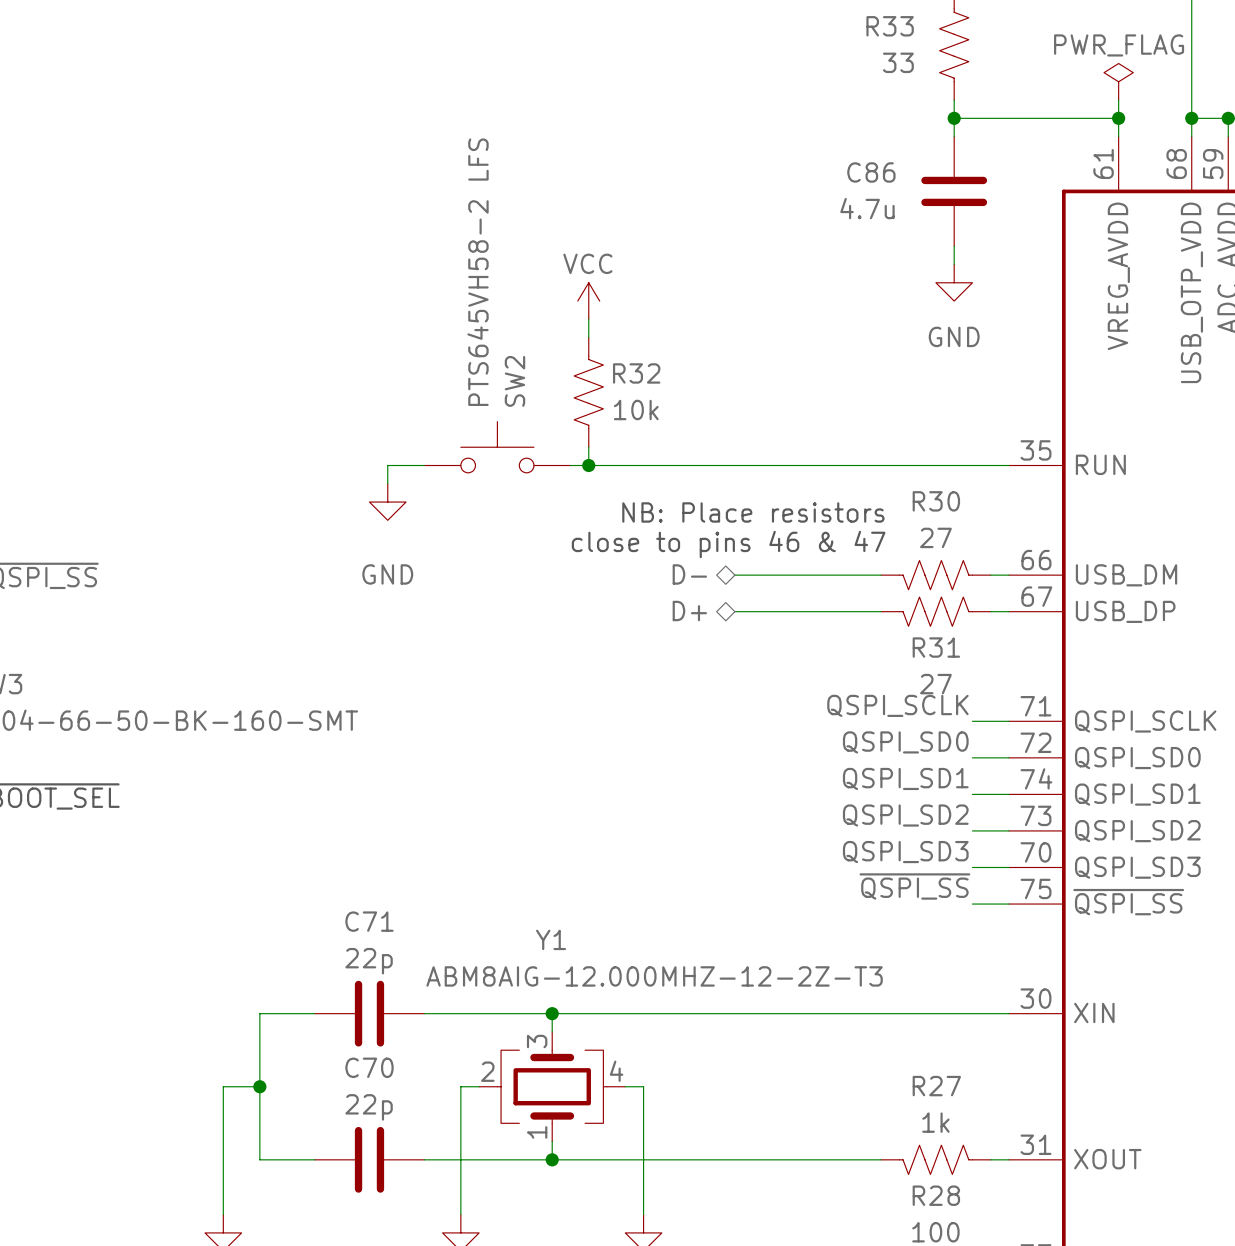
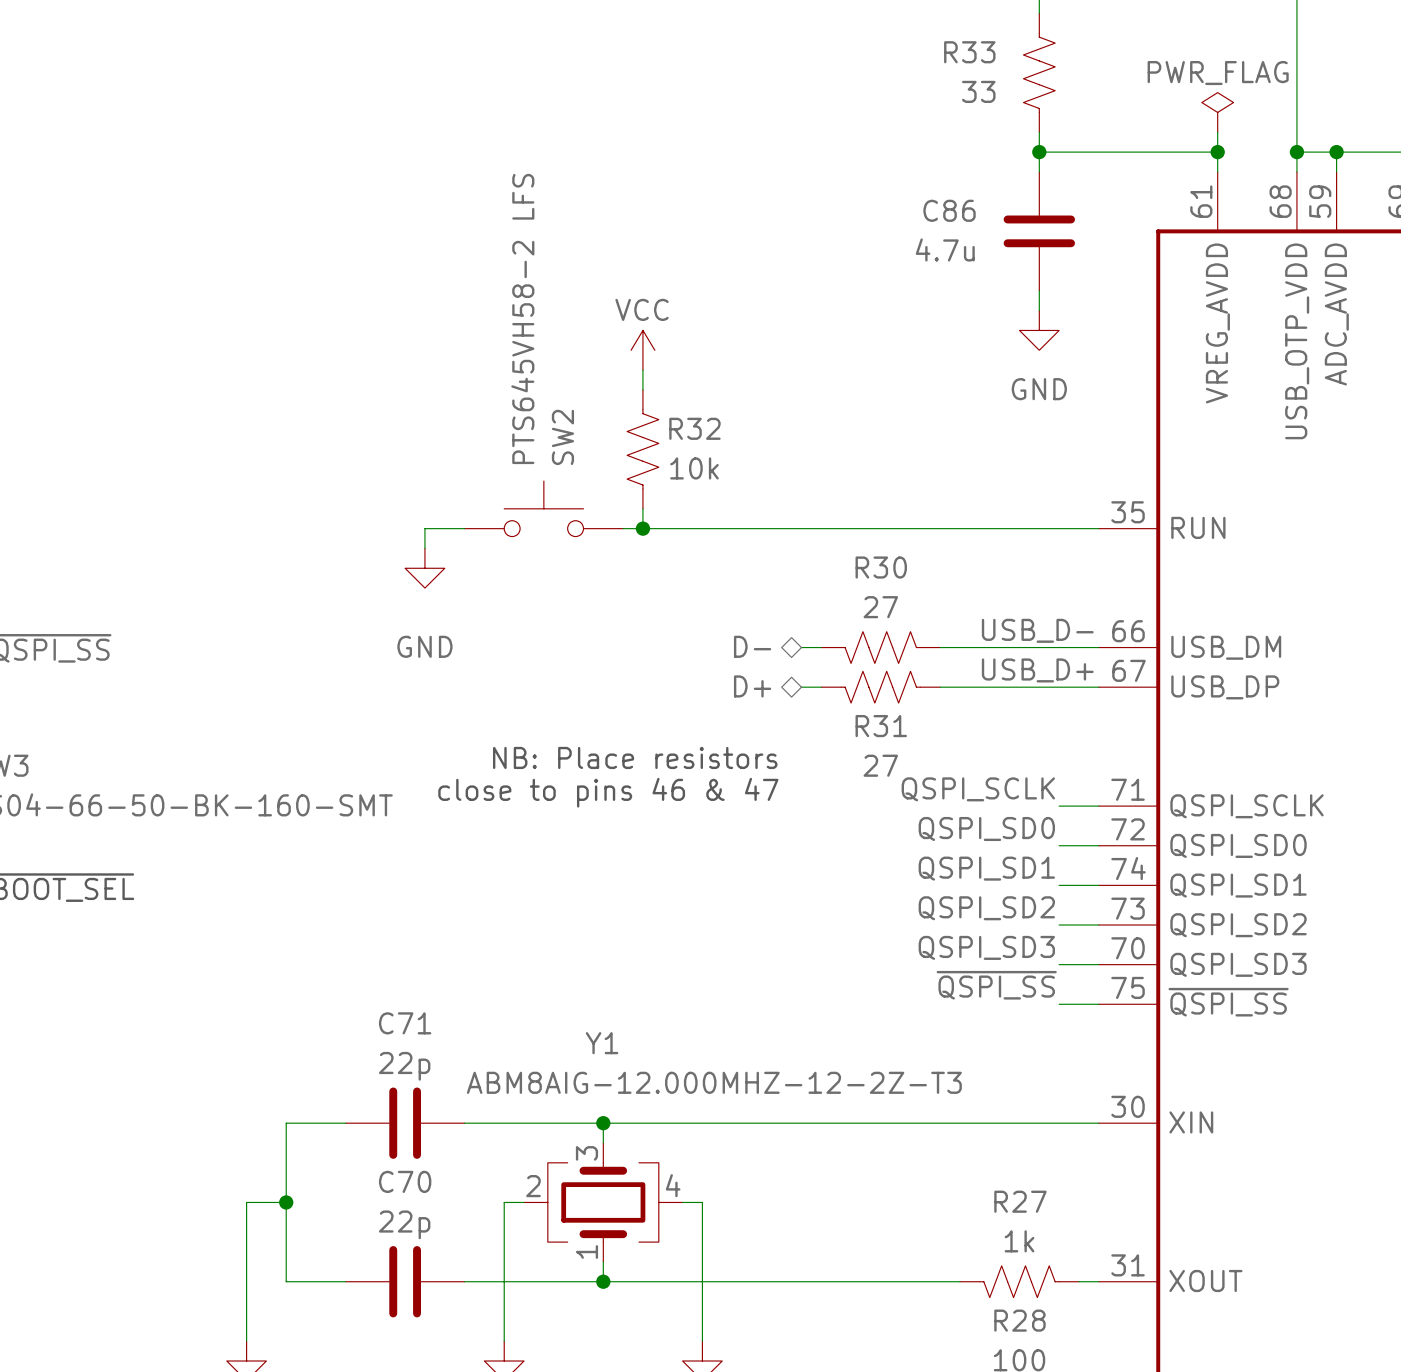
text position: NB: Place resistors (753, 512) -> NB: Place resistors (635, 757)
text position: close to pins 46 & 47 (728, 544) -> close to pins 46 & 47 (608, 792)
label: none -> USB_D- (1037, 630)
wire: (753, 575) (862, 575) -> (960, 647) (1078, 647)
R30 position: (935, 575) -> (880, 647)
label: none -> USB_D+ (1037, 670)
wire: (753, 611) (862, 611) -> (960, 687) (1078, 687)
R31 position: (935, 611) -> (880, 687)

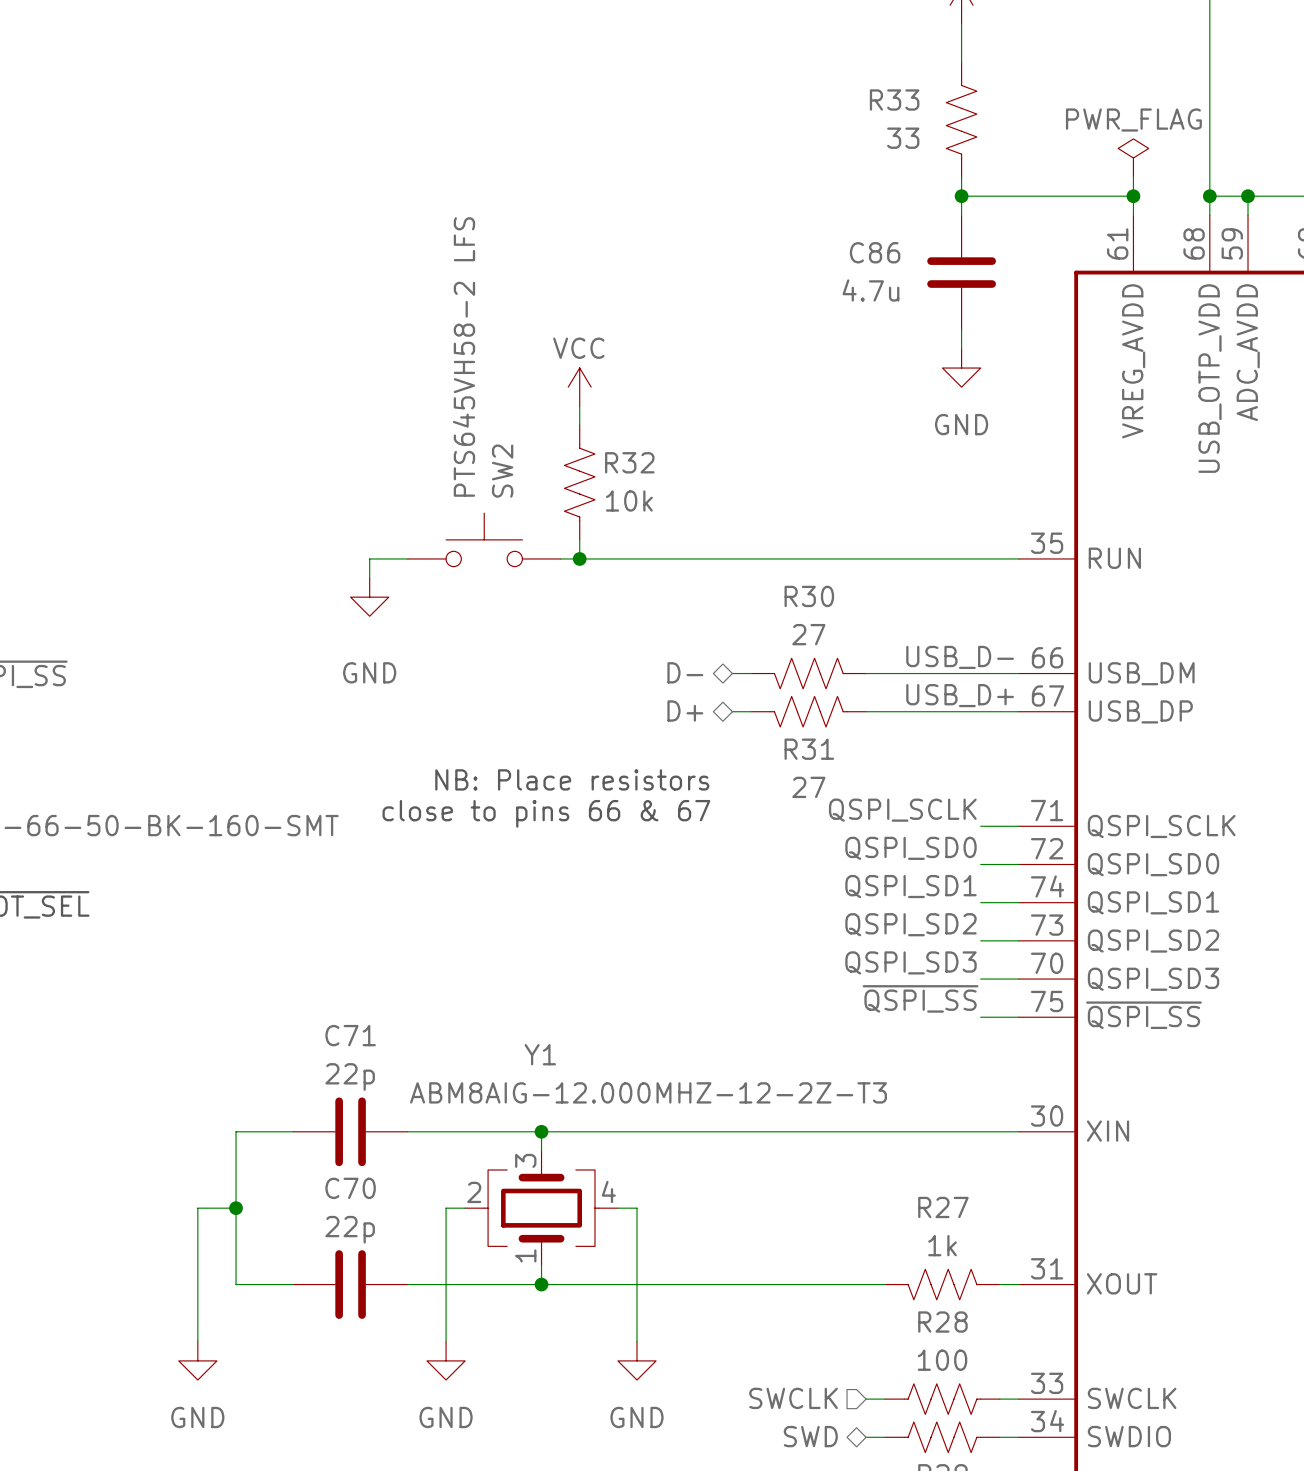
text: close to pins 46 & 47 (608, 792) -> close to pins 66 & 67 (546, 813)

